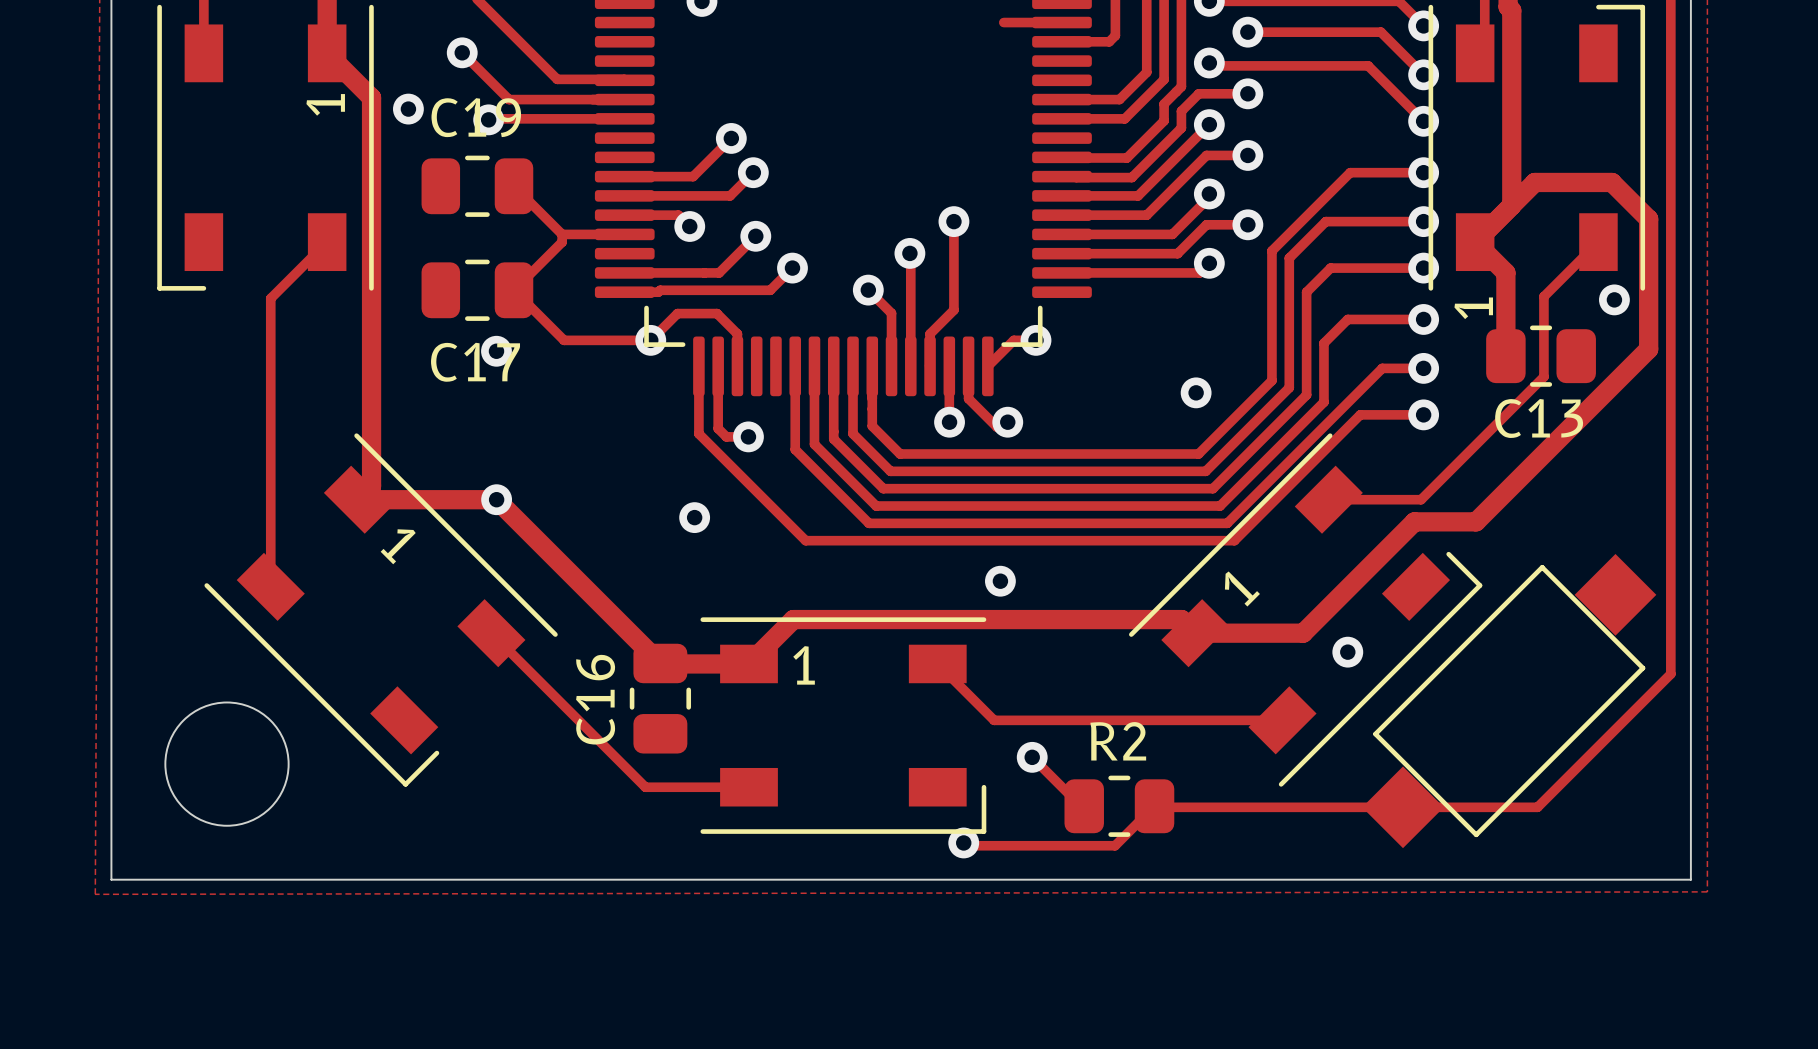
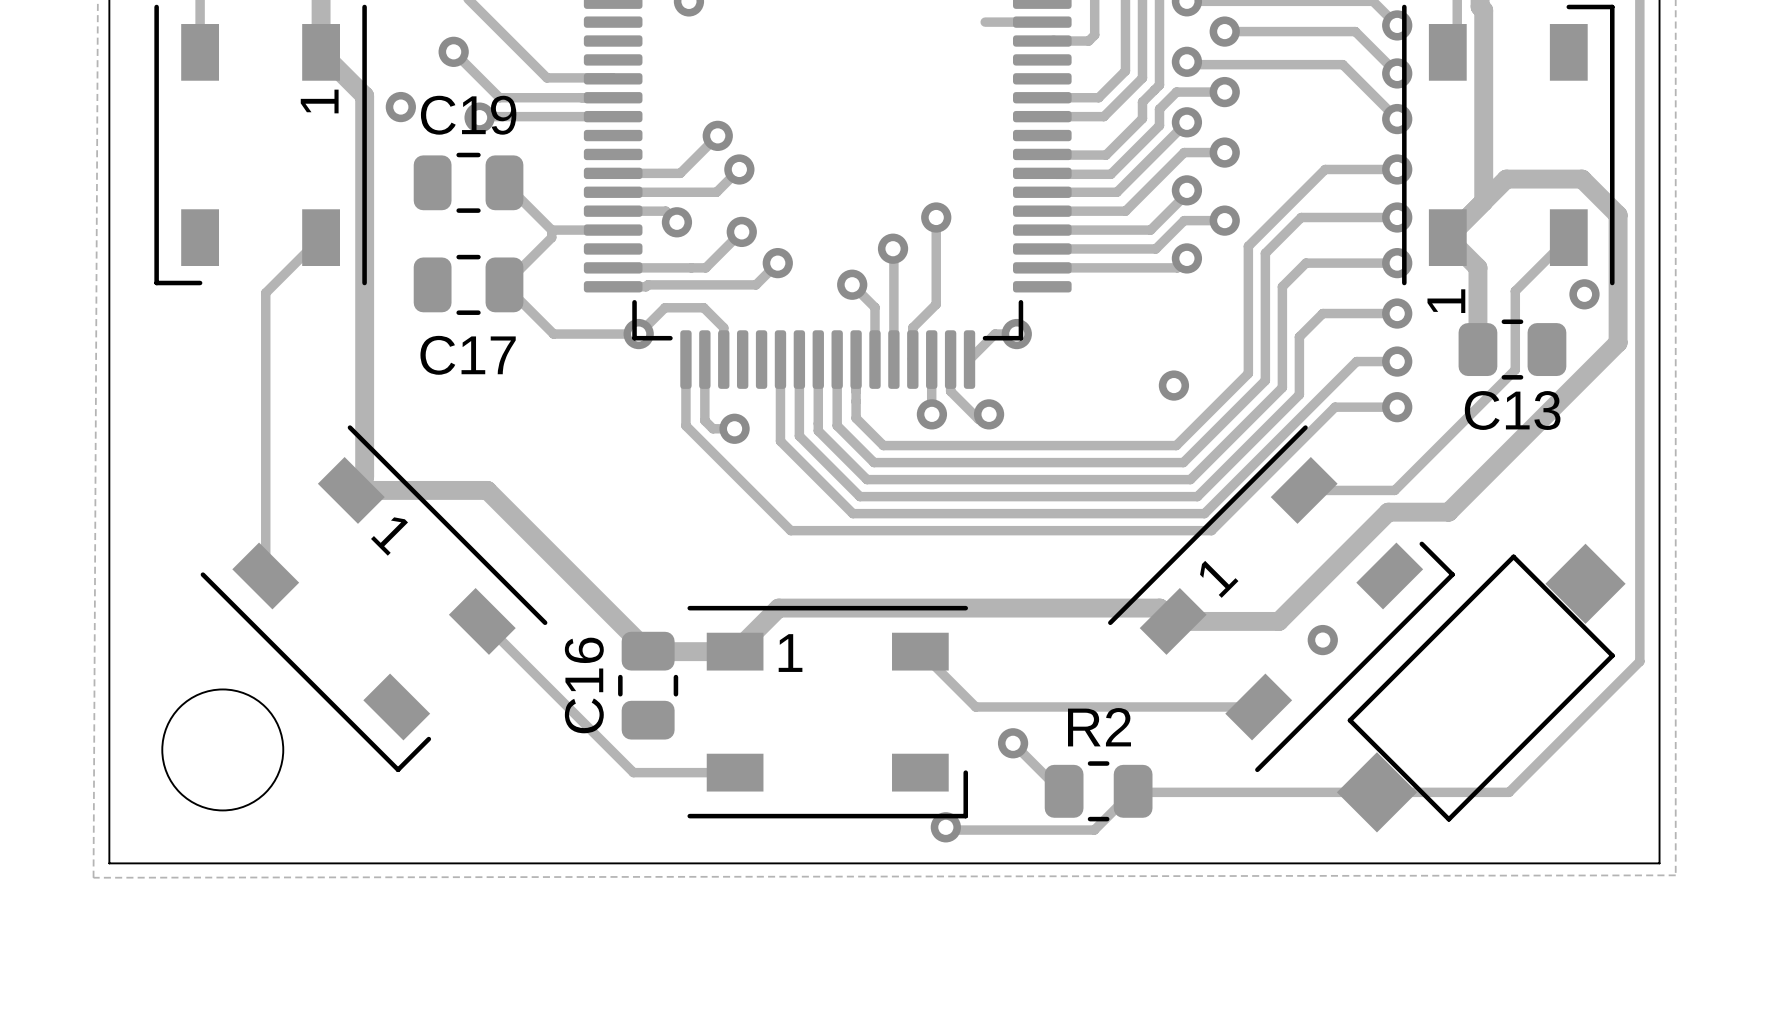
via: (496, 351) -> none
via: (496, 499) -> none
via: (694, 517) -> none
via: (1000, 581) -> none

